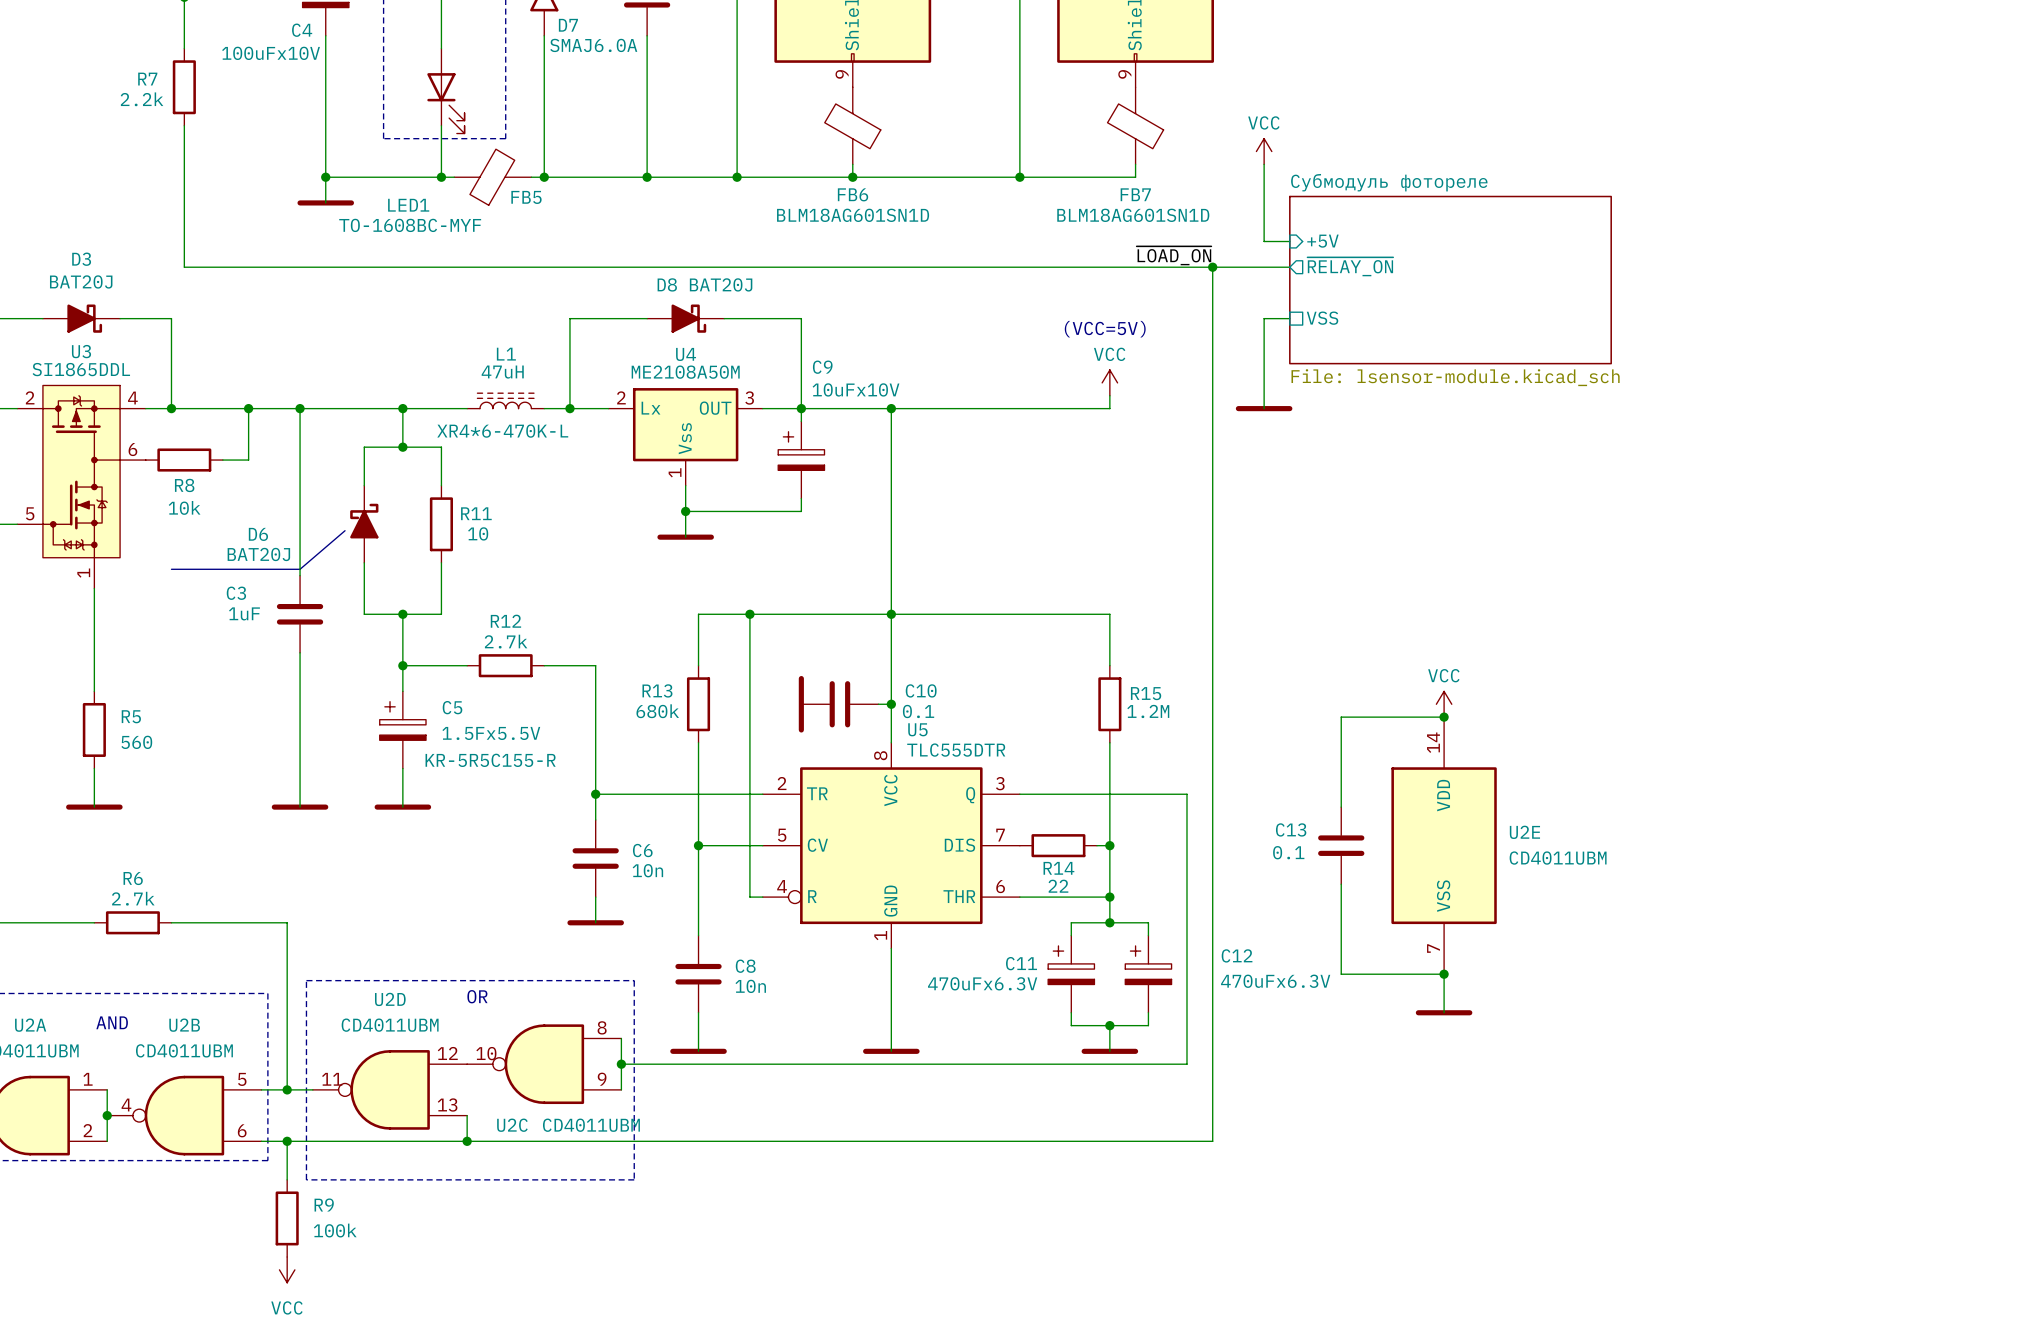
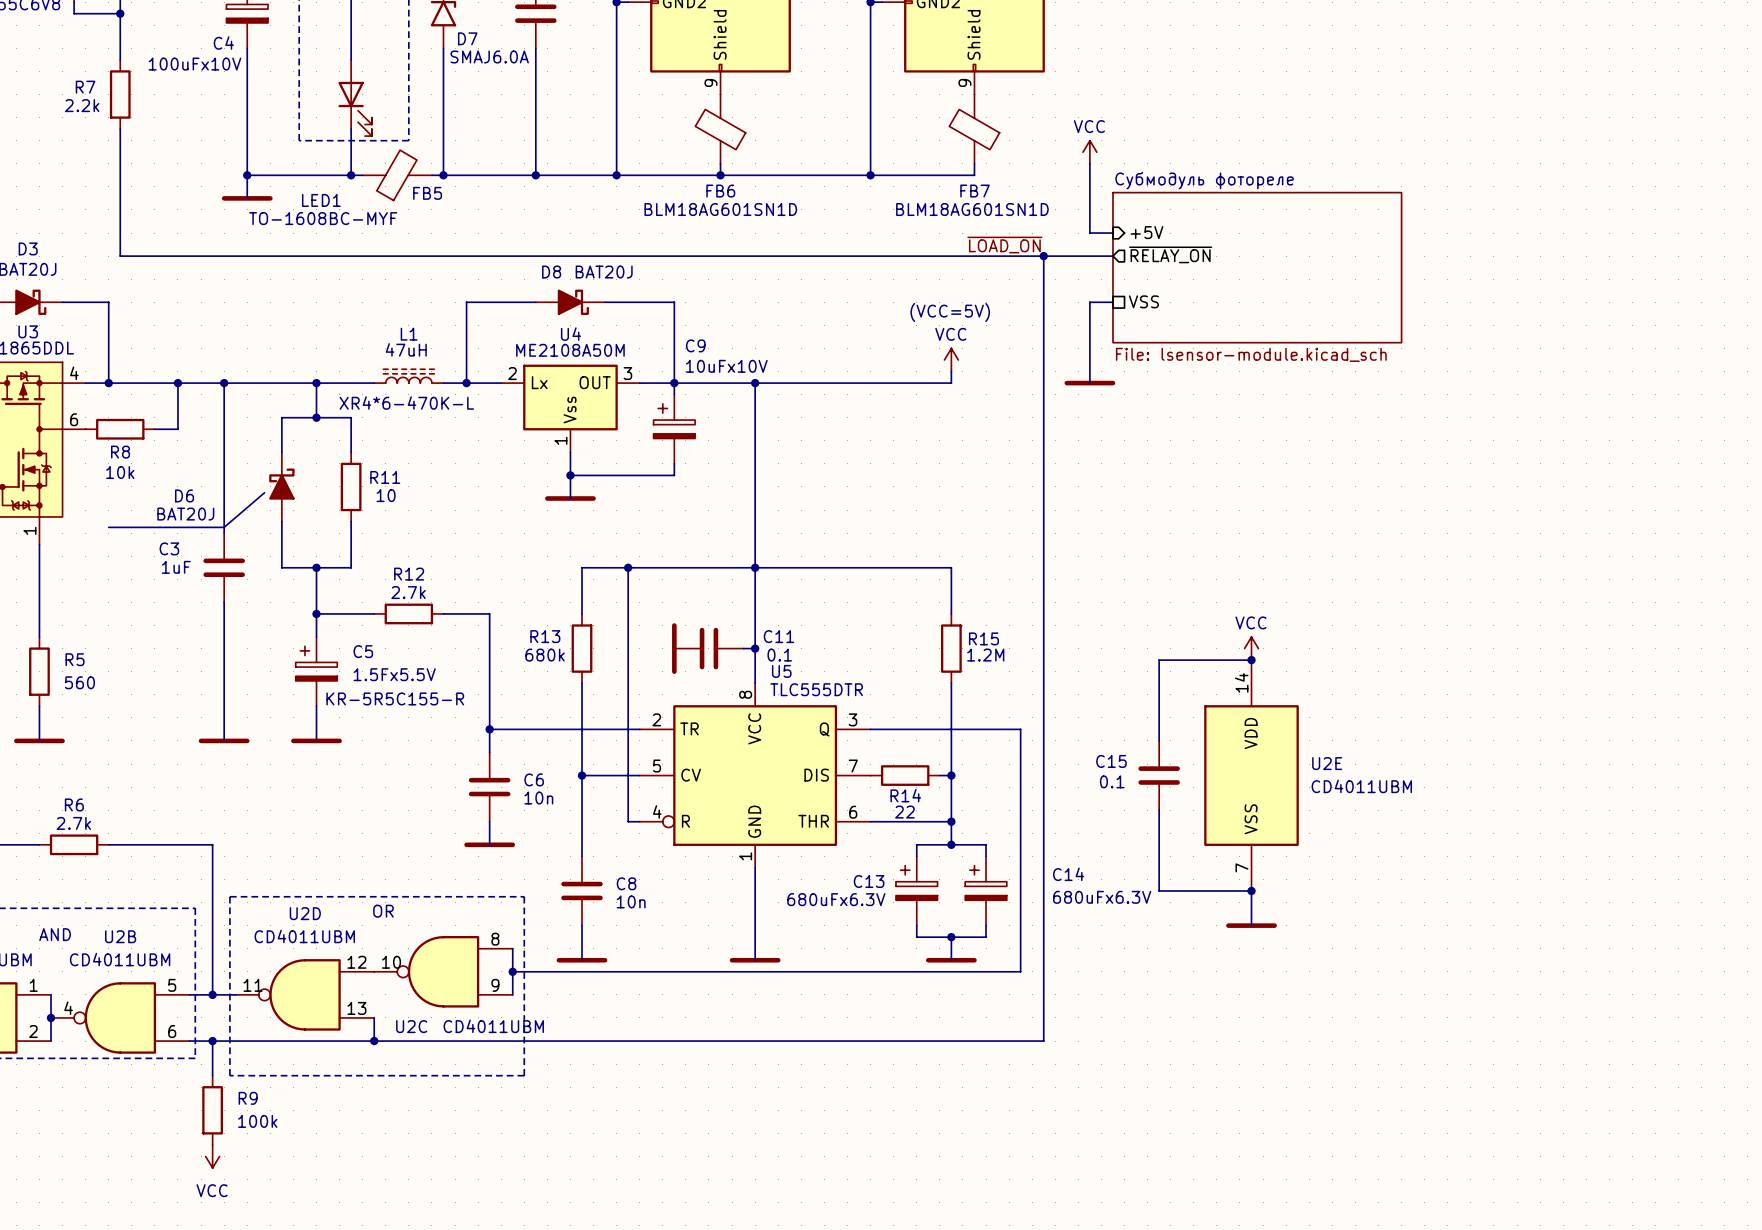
C10 name: C10 (921, 690) -> C11 (779, 636)
C13 name: C13 (1291, 829) -> C15 (1111, 761)
C12 name: C12 (1237, 955) -> C14 (1068, 874)
C11 name: C11 (1021, 963) -> C13 (869, 881)
C12 value: 470uFx6.3V (1275, 981) -> 680uFx6.3V (1102, 897)
C11 value: 470uFx6.3V (982, 983) -> 680uFx6.3V (836, 899)

